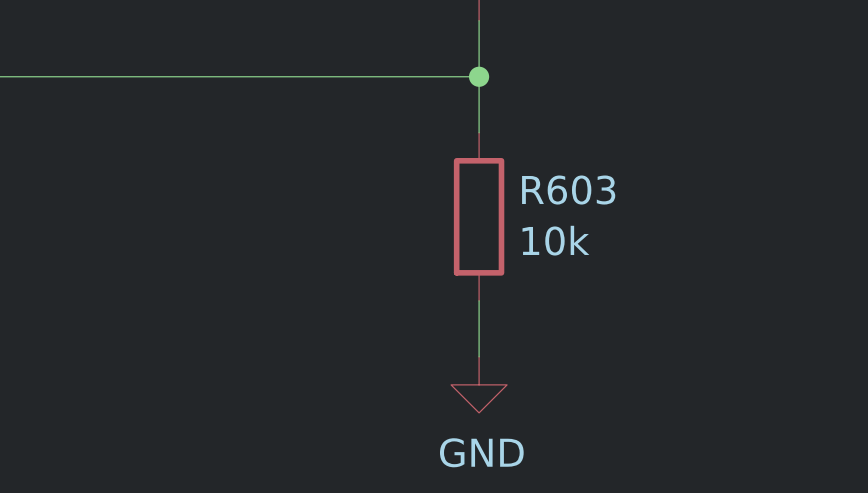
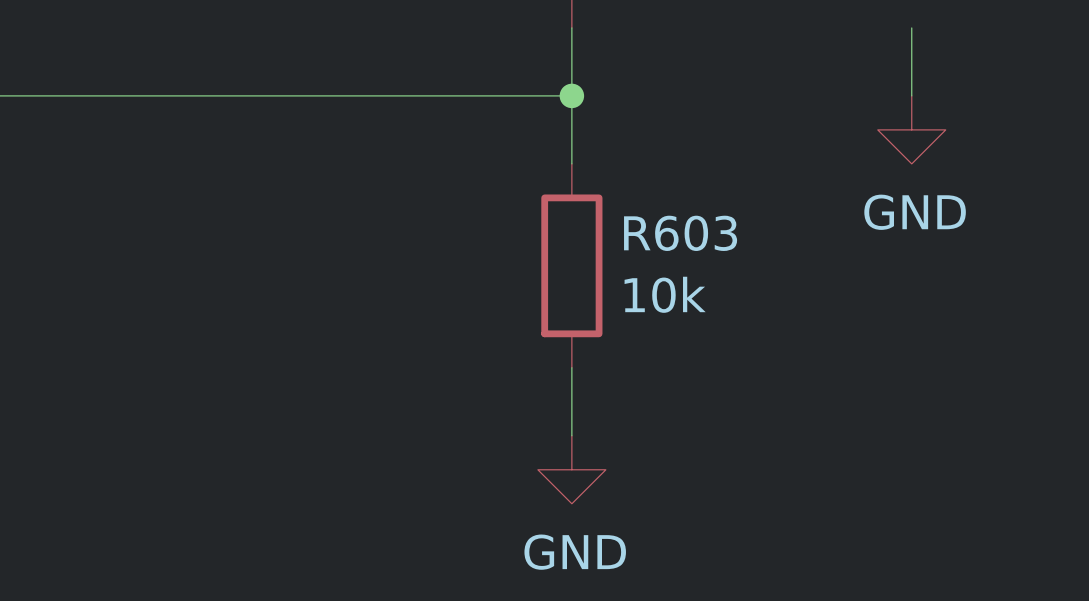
wire: none -> (911, 27) (911, 95)
power symbol: none -> GND (911, 129)

